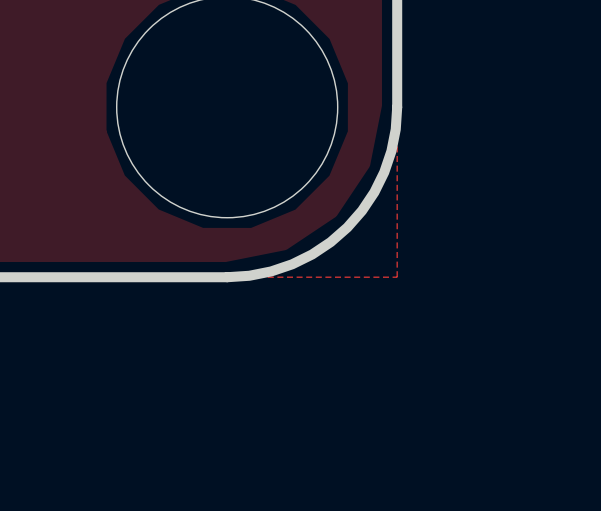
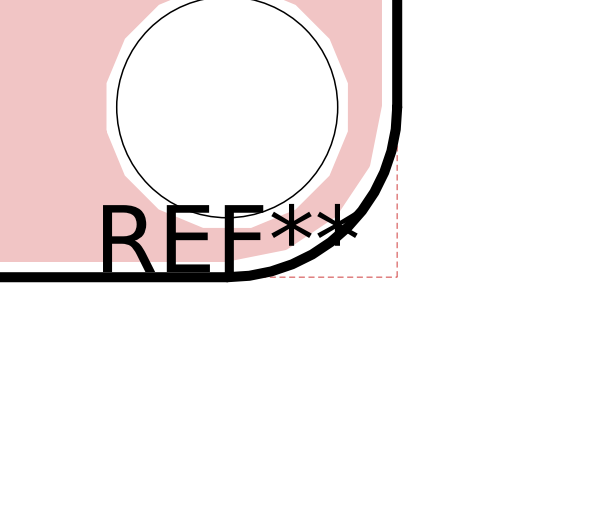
REF** name: none -> REF** (230, 237)

